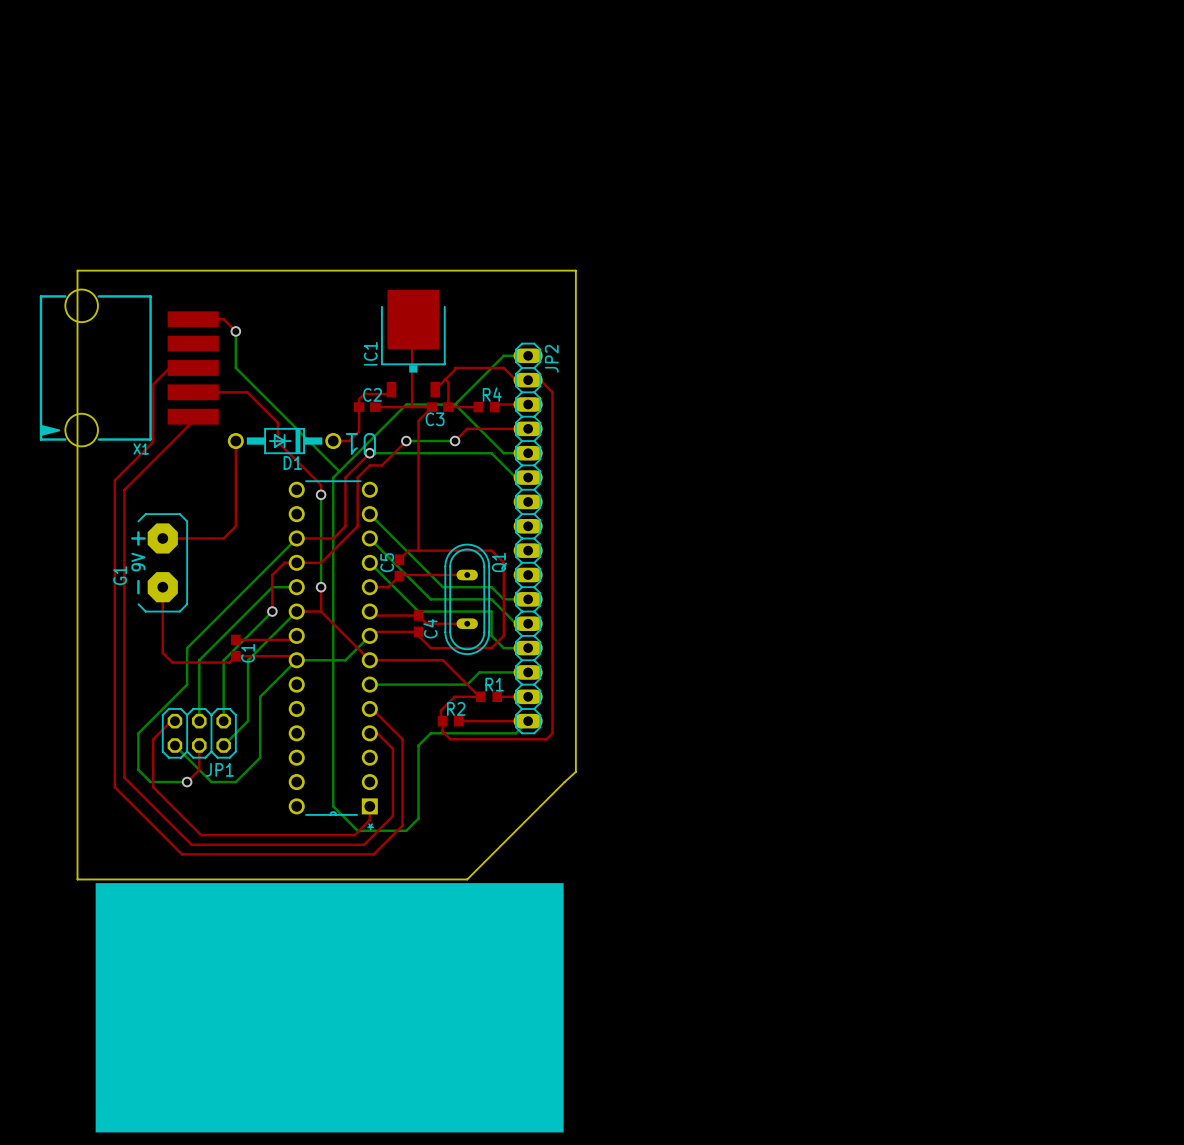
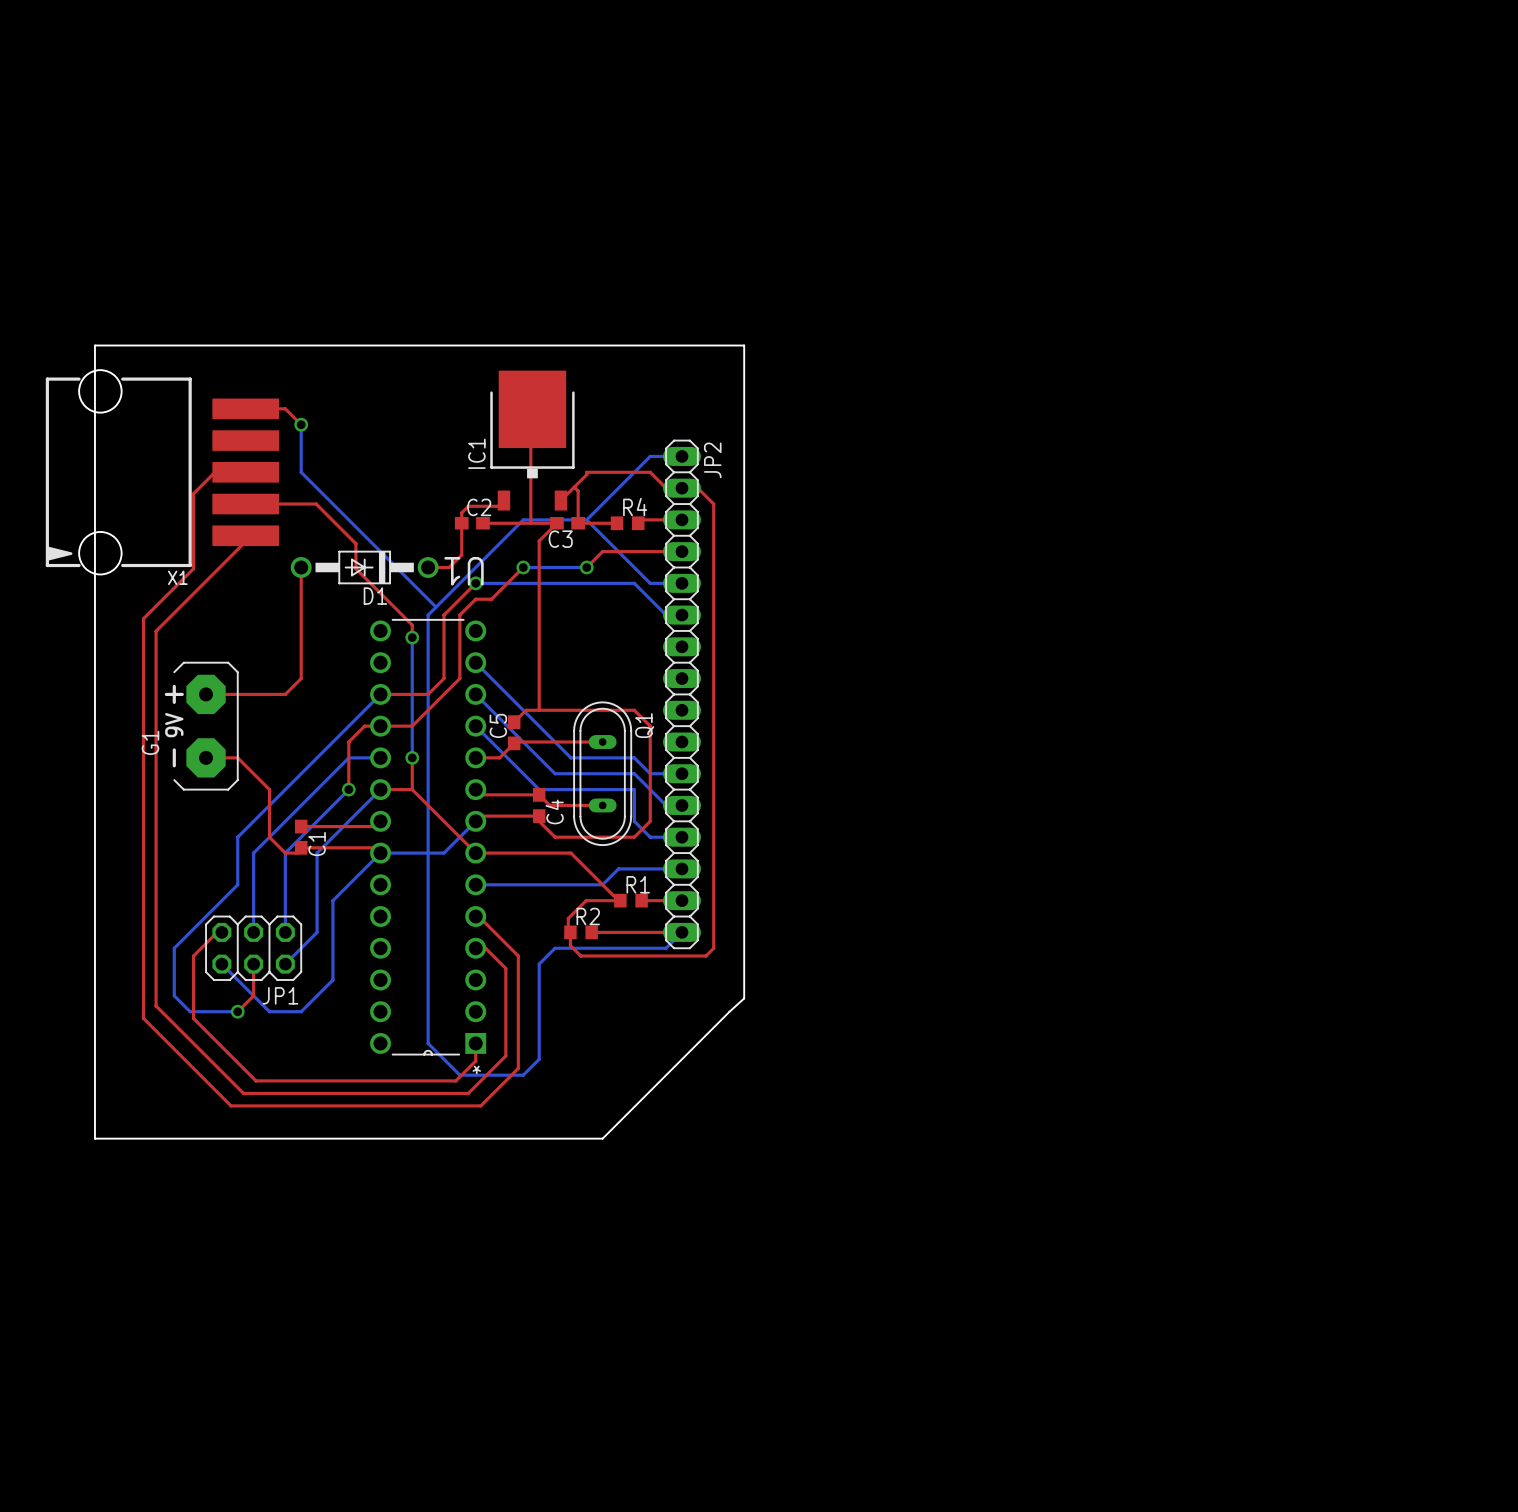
top track: (162, 587) (162, 652) (172, 662) (229, 662) (231, 660) -> (206, 757) (237, 757) (269, 789) (269, 837) (285, 853) (295, 853)
drawing: [95, 883, 564, 1133] -> none

